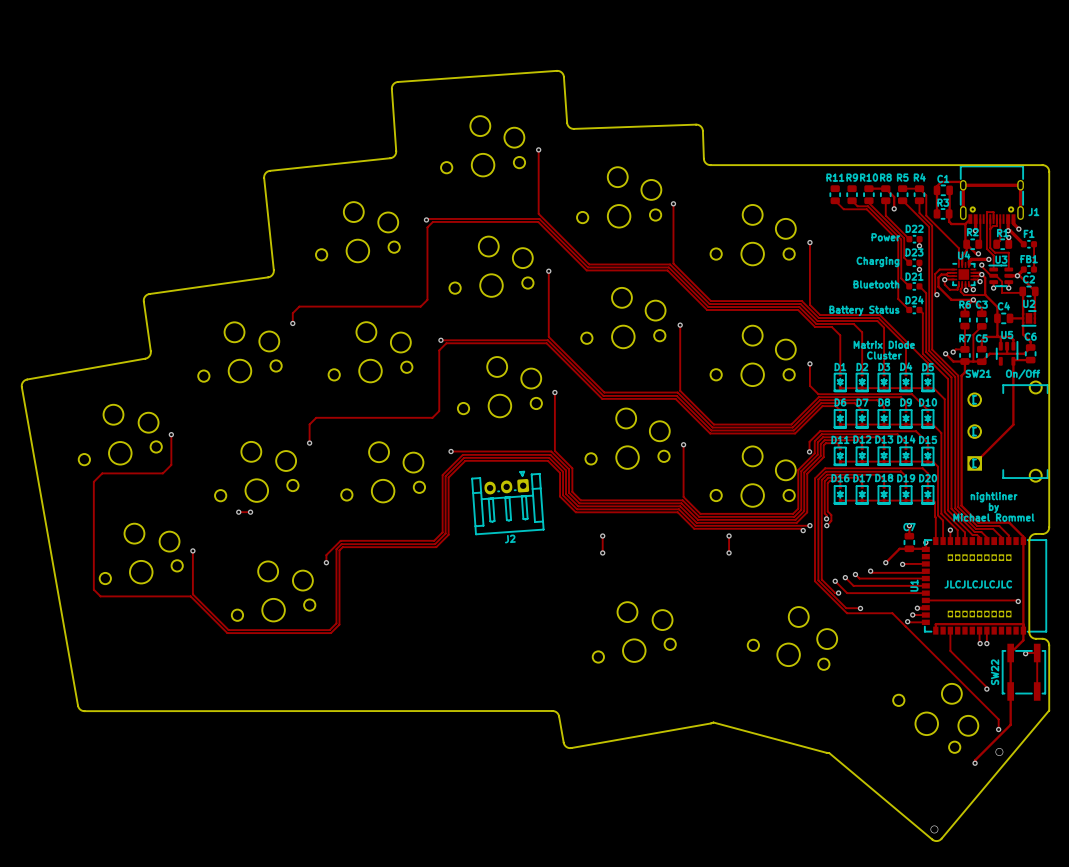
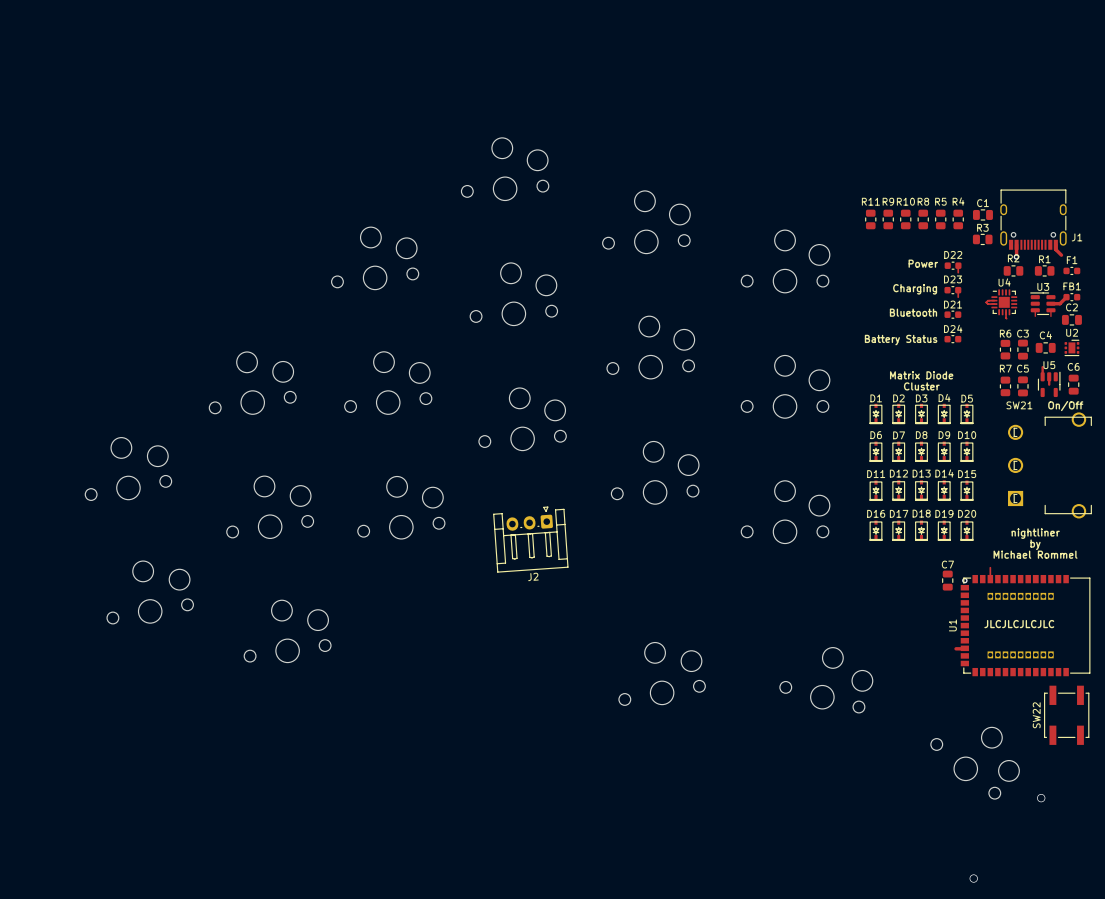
board edge: (556, 70) (395, 82) (391, 88) (396, 151) (393, 157) (270, 170) (265, 173) (273, 270) (271, 276) (148, 294) (143, 300) (150, 352) (147, 357) (27, 379) (22, 382) (21, 387) (78, 707) (84, 711) (553, 711) (558, 715) (564, 744) (569, 748) (713, 722) (829, 753) (932, 839) (939, 840) (1049, 710) (1048, 643) (1045, 639) (1032, 637) (1029, 632) (1029, 539) (1033, 534) (1045, 533) (1049, 527) (1048, 168) (1042, 165) (708, 164) (703, 159) (702, 129) (697, 124) (569, 127) (567, 122) (563, 76) (561, 72) (556, 70) -> none
track: (538, 149) (538, 213) (589, 264) (670, 264) (709, 304) (800, 304) (817, 320) (877, 320) (884, 327) (884, 374) -> none
via: (538, 149) -> none
track: (963, 185) (959, 181) (941, 181) (937, 186) (937, 213) -> none
track: (963, 185) (963, 213) -> none
track: (963, 185) (1020, 185) (1020, 213) -> none
track: (868, 188) (885, 188) (894, 197) (894, 208) -> none
track: (902, 188) (919, 188) (926, 195) (926, 215) (958, 248) (958, 264) -> none
track: (949, 190) (949, 221) (951, 224) (965, 224) -> none
track: (835, 200) (843, 209) (866, 209) (898, 240) (898, 299) (909, 309) -> none
track: (852, 200) (857, 206) (868, 206) (901, 239) (901, 278) (909, 286) -> none
track: (868, 200) (868, 202) (904, 238) (904, 257) (909, 262) -> none
track: (885, 200) (885, 215) (909, 239) -> none
track: (902, 200) (929, 227) (929, 350) (955, 376) (955, 508) (975, 528) (993, 528) (1001, 537) (1001, 541) -> none
track: (919, 200) (919, 213) (932, 225) (932, 349) (958, 375) (958, 507) (977, 525) (999, 525) (1008, 535) (1008, 541) -> none
track: (673, 203) (673, 263) (710, 301) (801, 301) (818, 318) (878, 318) (905, 345) (905, 374) -> none
via: (673, 203) -> none
via: (894, 208) -> none
track: (426, 219) (539, 218) (587, 267) (668, 267) (708, 307) (799, 307) (816, 323) (853, 323) (862, 332) (862, 374) -> none
via: (426, 219) -> none
track: (970, 219) (965, 224) -> none
track: (980, 219) (978, 244) -> none
track: (990, 219) (990, 247) (994, 252) (1008, 252) (1008, 269) -> none
track: (993, 219) (993, 212) (987, 212) (986, 248) (993, 255) (993, 269) -> none
track: (996, 219) (996, 225) (990, 229) -> none
track: (1000, 219) (1000, 240) (996, 244) -> none
track: (1008, 219) (1008, 230) (1023, 244) -> none
track: (965, 224) (965, 243) (978, 253) -> none
via: (1018, 229) -> none
via: (1008, 230) -> none
via: (1008, 237) -> none
track: (809, 242) (809, 304) (820, 315) (879, 315) (927, 363) (927, 374) -> none
via: (809, 242) -> none
track: (966, 244) (966, 250) (962, 255) (962, 264) -> none
track: (1034, 244) (1034, 269) -> none
via: (919, 245) -> none
via: (978, 253) -> none
track: (988, 259) (971, 259) (969, 264) -> none
via: (988, 259) -> none
track: (981, 265) (991, 275) (996, 275) (1002, 281) (1002, 292) (1023, 291) (1023, 334) (1030, 341) (1030, 347) (1024, 353) (989, 353) (981, 361) (953, 361) (945, 353) -> none
via: (981, 265) -> none
via: (919, 269) -> none
track: (954, 269) (939, 269) (935, 274) (935, 292) (936, 294) -> none
track: (548, 271) (548, 336) (604, 392) (677, 392) (712, 427) (792, 427) (819, 400) (877, 400) (884, 406) (884, 410) -> none
via: (548, 271) -> none
track: (973, 272) (980, 272) (985, 277) (985, 294) (997, 307) (998, 336) -> none
track: (946, 274) (941, 274) (938, 277) (938, 286) (951, 299) (973, 299) -> none
track: (981, 274) (973, 276) -> none
via: (981, 274) -> none
track: (1017, 275) (1035, 291) (1034, 322) -> none
via: (1017, 275) -> none
via: (944, 279) -> none
track: (953, 279) (944, 279) (944, 284) (949, 289) (957, 289) (958, 284) -> none
track: (973, 279) (980, 281) -> none
via: (980, 281) -> none
track: (962, 284) (960, 291) (964, 295) (984, 295) -> none
track: (968, 284) (973, 289) -> none
track: (919, 286) (926, 293) (926, 352) (951, 377) (951, 508) (974, 531) (981, 531) (986, 537) (986, 541) -> none
via: (993, 288) -> none
via: (1008, 288) -> none
via: (973, 289) -> none
via: (966, 290) -> none
via: (936, 294) -> none
track: (973, 299) (981, 308) (981, 313) -> none
track: (973, 299) (964, 308) (964, 314) -> none
via: (973, 299) -> none
track: (919, 309) (922, 313) (922, 353) (948, 379) (948, 510) (972, 534) (977, 534) (979, 541) -> none
track: (1010, 318) (1022, 318) -> none
track: (292, 323) (292, 313) (299, 306) (420, 306) (427, 299) (427, 227) (432, 221) (538, 221) (586, 270) (667, 270) (707, 310) (798, 310) (815, 326) (831, 326) (840, 335) (840, 374) -> none
via: (292, 323) -> none
track: (680, 325) (680, 390) (713, 424) (791, 424) (818, 397) (900, 397) (905, 402) (905, 410) -> none
via: (680, 325) -> none
track: (964, 326) (964, 349) (955, 349) (953, 352) -> none
track: (981, 326) (973, 334) (973, 361) -> none
track: (440, 340) (547, 340) (603, 395) (676, 395) (711, 430) (793, 430) (821, 403) (854, 403) (862, 410) -> none
via: (440, 340) -> none
track: (1013, 346) (1013, 339) (1010, 336) (985, 336) (981, 340) (981, 349) -> none
via: (953, 352) -> none
via: (945, 353) -> none
track: (1030, 360) (1013, 361) (1013, 424) (974, 463) -> none
track: (964, 361) (964, 372) (961, 375) (961, 505) (978, 522) (1009, 522) (1023, 536) (1023, 640) (1010, 653) (1010, 724) (975, 760) (975, 763) -> none
track: (809, 363) (809, 385) (818, 394) (911, 394) (927, 410) -> none
via: (809, 363) -> none
track: (840, 388) (933, 388) (944, 399) (944, 512) (964, 532) (964, 541) -> none
track: (554, 392) (554, 450) (572, 468) (572, 491) (580, 500) (682, 500) (699, 516) (794, 516) (801, 509) (801, 471) (817, 454) (817, 442) (822, 437) (879, 437) (884, 442) (884, 447) -> none
via: (554, 392) -> none
track: (840, 410) (836, 406) (822, 406) (795, 433) (710, 433) (675, 398) (602, 398) (546, 343) (446, 343) (439, 350) (439, 411) (432, 417) (316, 417) (309, 424) (309, 443) -> none
track: (840, 424) (932, 424) (941, 432) (941, 513) (957, 530) (957, 541) -> none
track: (171, 434) (171, 464) (162, 473) (102, 473) (93, 481) (93, 589) (100, 596) (190, 596) (227, 633) (330, 633) (339, 624) (339, 550) (342, 547) (436, 547) (448, 534) (448, 477) (465, 460) (547, 460) (560, 472) (560, 496) (575, 512) (677, 512) (694, 528) (801, 528) (803, 530) -> none
via: (171, 434) -> none
via: (309, 443) -> none
track: (683, 444) (683, 497) (700, 513) (793, 513) (798, 508) (798, 469) (814, 453) (814, 441) (821, 434) (897, 434) (905, 442) (905, 447) -> none
via: (683, 444) -> none
track: (862, 447) (862, 443) (858, 440) (824, 440) (820, 444) (820, 455) (804, 472) (804, 511) (795, 519) (697, 519) (681, 503) (579, 503) (569, 492) (569, 469) (551, 451) (451, 451) -> none
track: (840, 448) (838, 443) (825, 443) (823, 445) (823, 457) (807, 473) (807, 512) (796, 522) (696, 522) (680, 506) (578, 506) (566, 494) (566, 470) (550, 454) (462, 454) (442, 475) (442, 532) (434, 540) (340, 540) (326, 555) (326, 562) -> none
track: (927, 448) (927, 443) (916, 431) (820, 431) (809, 441) (809, 451) -> none
via: (451, 451) -> none
via: (809, 451) -> none
track: (840, 462) (933, 462) (938, 466) (938, 515) (943, 520) (943, 541) -> none
track: (840, 486) (838, 480) (830, 480) (827, 483) (827, 511) (831, 515) (831, 520) (826, 525) -> none
track: (862, 486) (862, 482) (857, 477) (828, 477) (824, 481) (824, 513) (826, 518) -> none
track: (884, 486) (884, 479) (879, 474) (827, 474) (821, 480) (821, 579) (835, 593) (838, 593) -> none
track: (905, 486) (905, 476) (900, 471) (825, 471) (818, 479) (818, 580) (846, 608) (860, 608) -> none
track: (927, 486) (927, 473) (922, 468) (825, 468) (815, 478) (815, 581) (847, 613) (892, 613) (905, 626) -> none
track: (840, 500) (933, 500) (935, 502) (935, 541) -> none
track: (238, 512) (250, 512) -> none
via: (238, 512) -> none
via: (250, 512) -> none
via: (826, 518) -> none
track: (809, 525) (695, 525) (679, 509) (577, 509) (563, 495) (563, 471) (549, 457) (464, 457) (445, 476) (445, 533) (435, 544) (341, 544) (336, 549) (336, 623) (329, 630) (228, 630) (192, 594) (192, 550) -> none
via: (809, 525) -> none
via: (826, 525) -> none
track: (909, 525) (909, 536) -> none
via: (909, 525) -> none
via: (803, 530) -> none
via: (950, 530) -> none
track: (602, 536) (602, 552) -> none
via: (602, 536) -> none
track: (729, 536) (729, 552) -> none
via: (729, 536) -> none
track: (925, 542) (925, 549) (899, 548) (885, 562) -> none
via: (192, 550) -> none
via: (602, 552) -> none
via: (729, 552) -> none
via: (326, 562) -> none
via: (885, 562) -> none
track: (925, 563) (902, 564) -> none
via: (902, 564) -> none
track: (870, 571) (872, 572) (924, 572) (925, 571) -> none
via: (870, 571) -> none
track: (855, 574) (859, 578) (925, 578) -> none
via: (855, 574) -> none
track: (845, 577) (853, 585) (925, 585) -> none
via: (845, 577) -> none
track: (835, 581) (847, 593) (925, 593) -> none
via: (835, 581) -> none
via: (838, 593) -> none
track: (925, 600) (1018, 601) -> none
via: (1018, 601) -> none
via: (860, 608) -> none
via: (917, 608) -> none
via: (912, 614) -> none
track: (925, 615) (912, 616) -> none
track: (907, 621) (925, 622) -> none
via: (907, 621) -> none
track: (1023, 624) (935, 624) (935, 630) -> none
track: (905, 626) (998, 719) (998, 729) -> none
track: (950, 630) (950, 650) (986, 689) -> none
track: (979, 630) (980, 643) -> none
track: (986, 630) (986, 643) -> none
via: (980, 643) -> none
via: (986, 643) -> none
track: (1025, 653) (1037, 653) (1037, 691) -> none
via: (1025, 653) -> none
via: (986, 689) -> none
via: (998, 729) -> none
via: (975, 763) -> none

